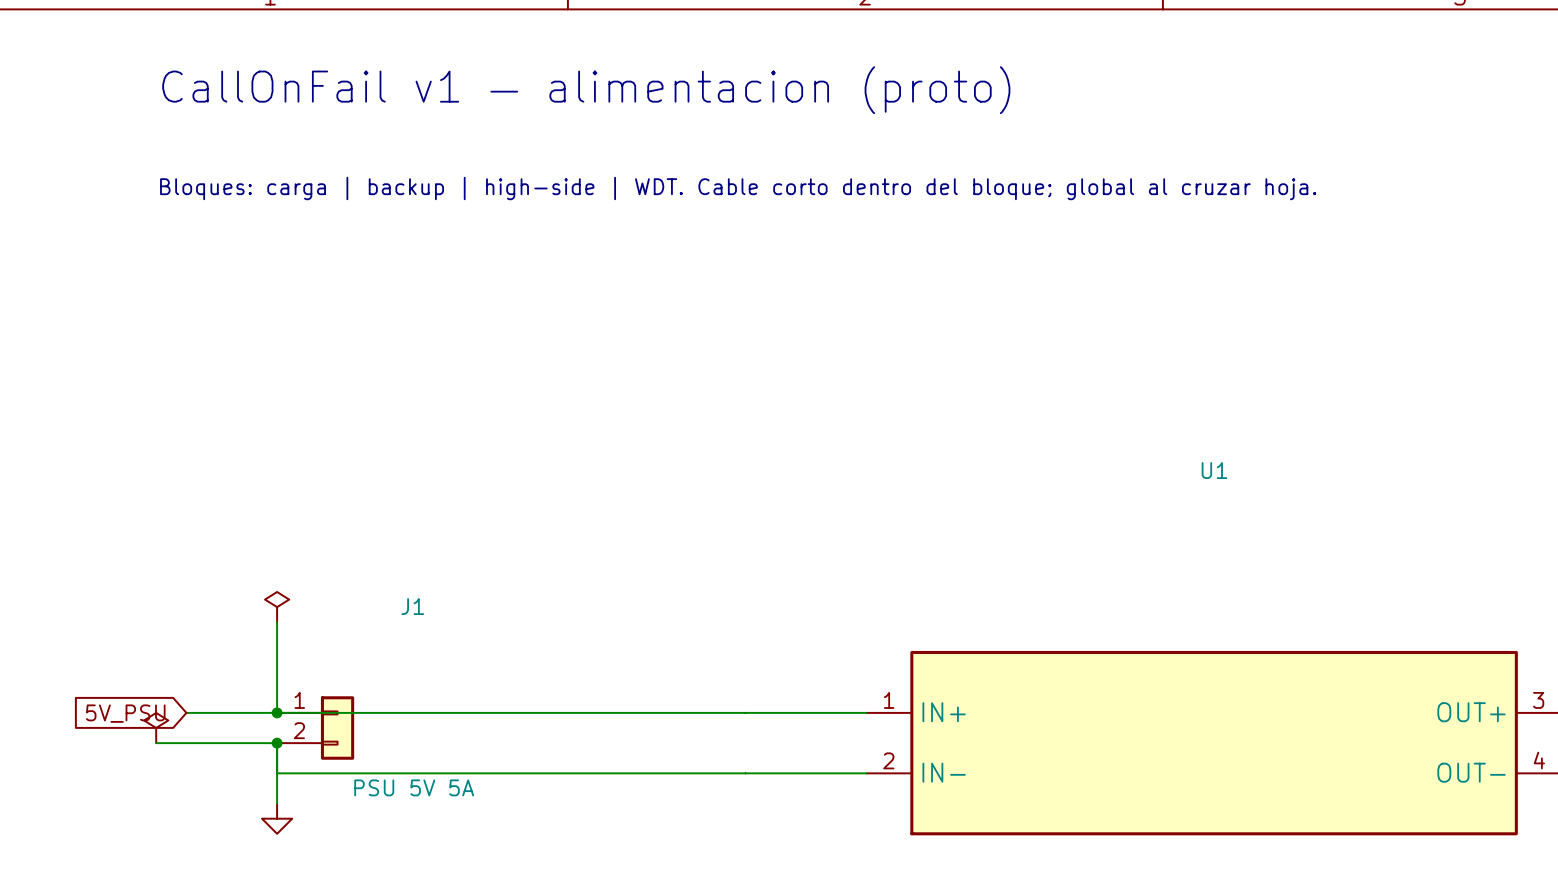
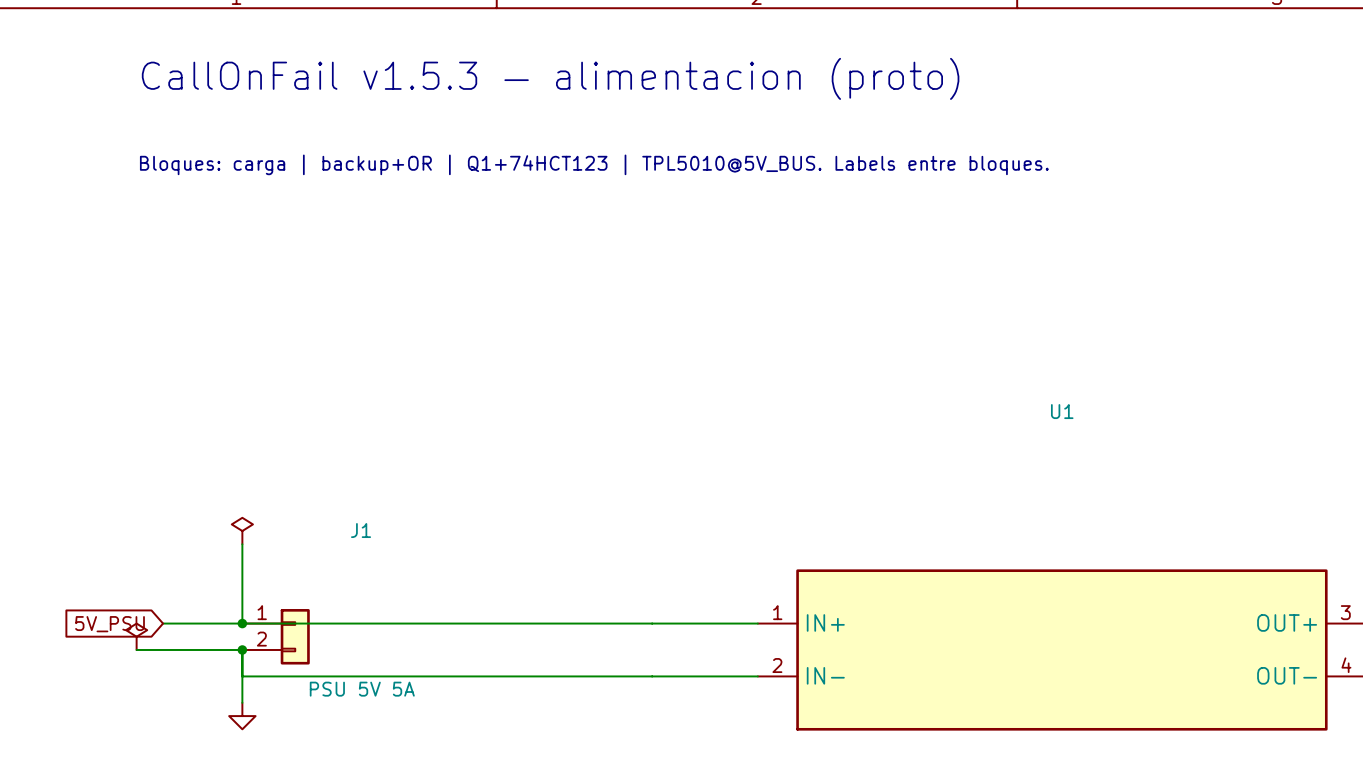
text: CallOnFail v1 — alimentacion (proto) (586, 90) -> CallOnFail v1.5.3 — alimentacion (proto) (550, 78)
text: Bloques: carga | backup | high-side | WDT. Cable corto dentro del bloque; global al cruzar hoja. (738, 188) -> Bloques: carga | backup+OR | Q1+74HCT123 | TPL5010@5V_BUS. Labels entre bloques. (594, 164)

